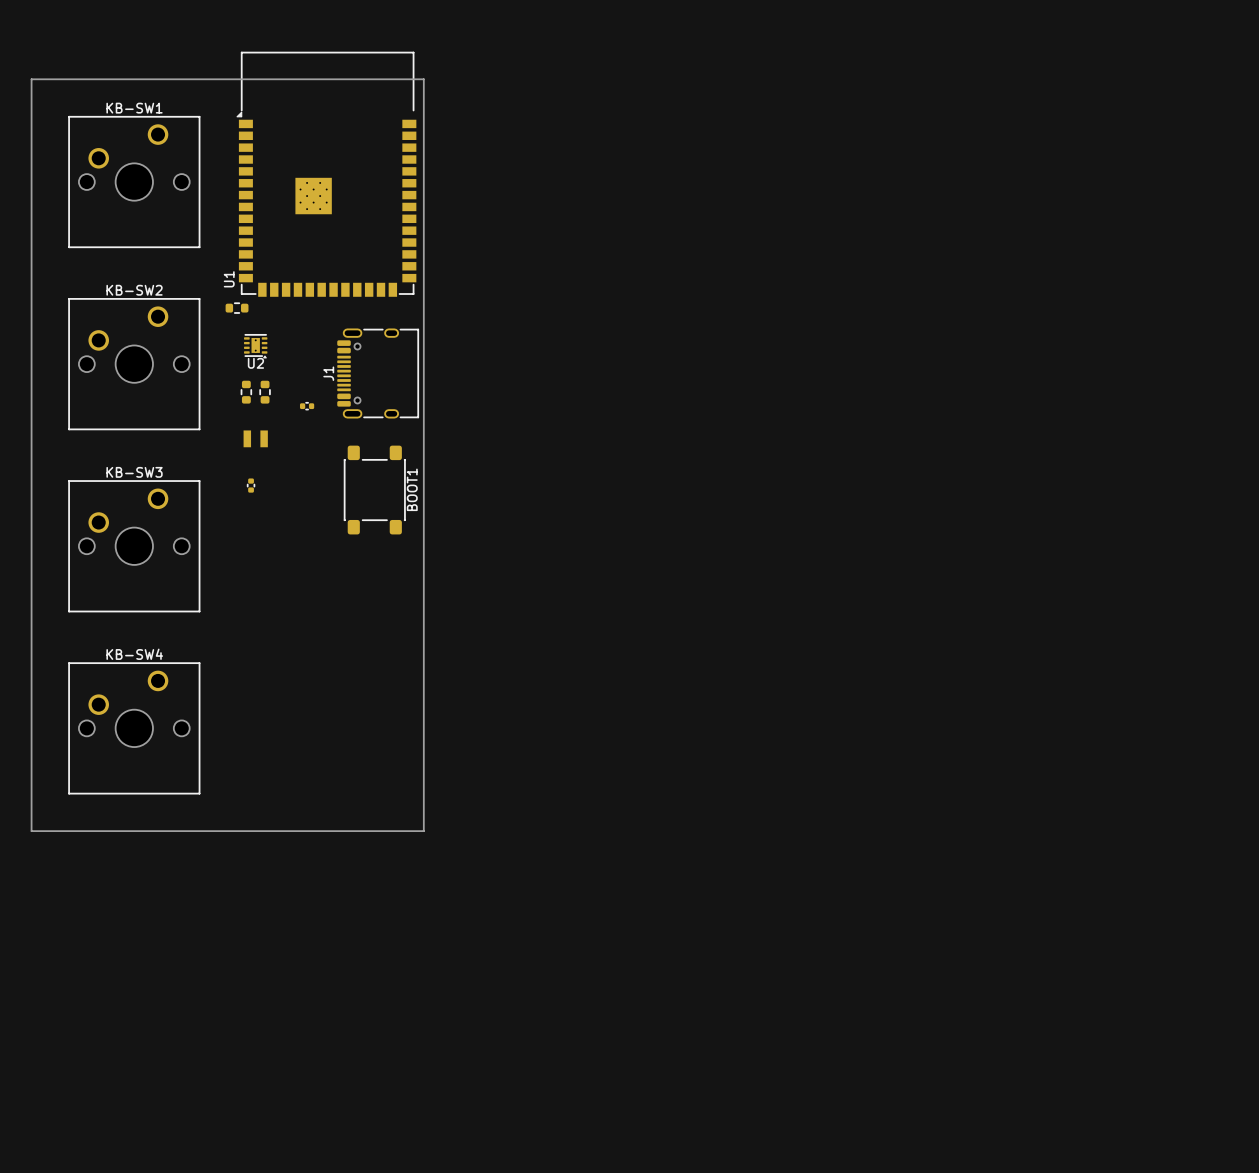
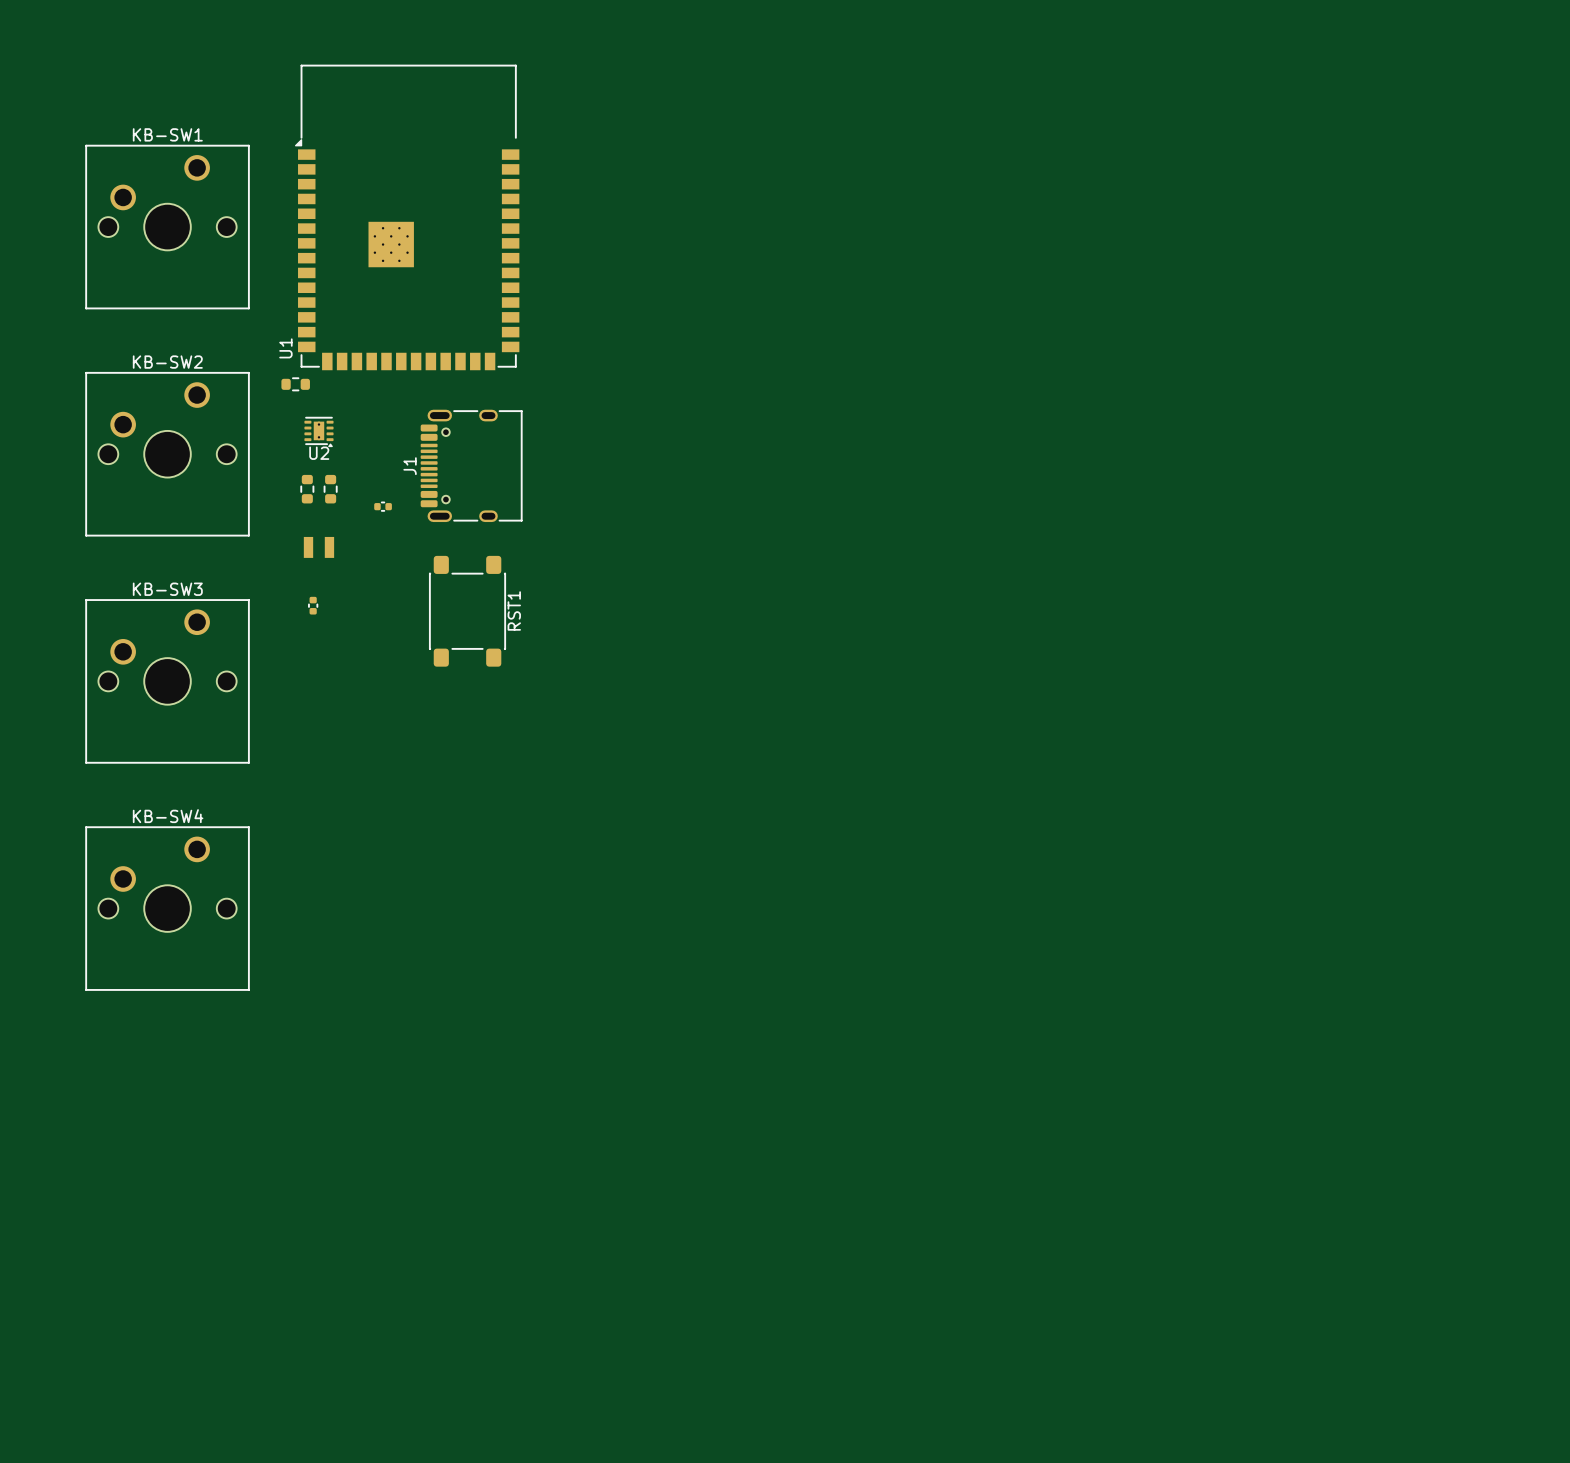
board edge: (31, 79) (423, 79) (423, 831) (31, 831) (31, 79) -> none
BOOT1 name: BOOT1 (412, 489) -> RST1 (514, 610)

